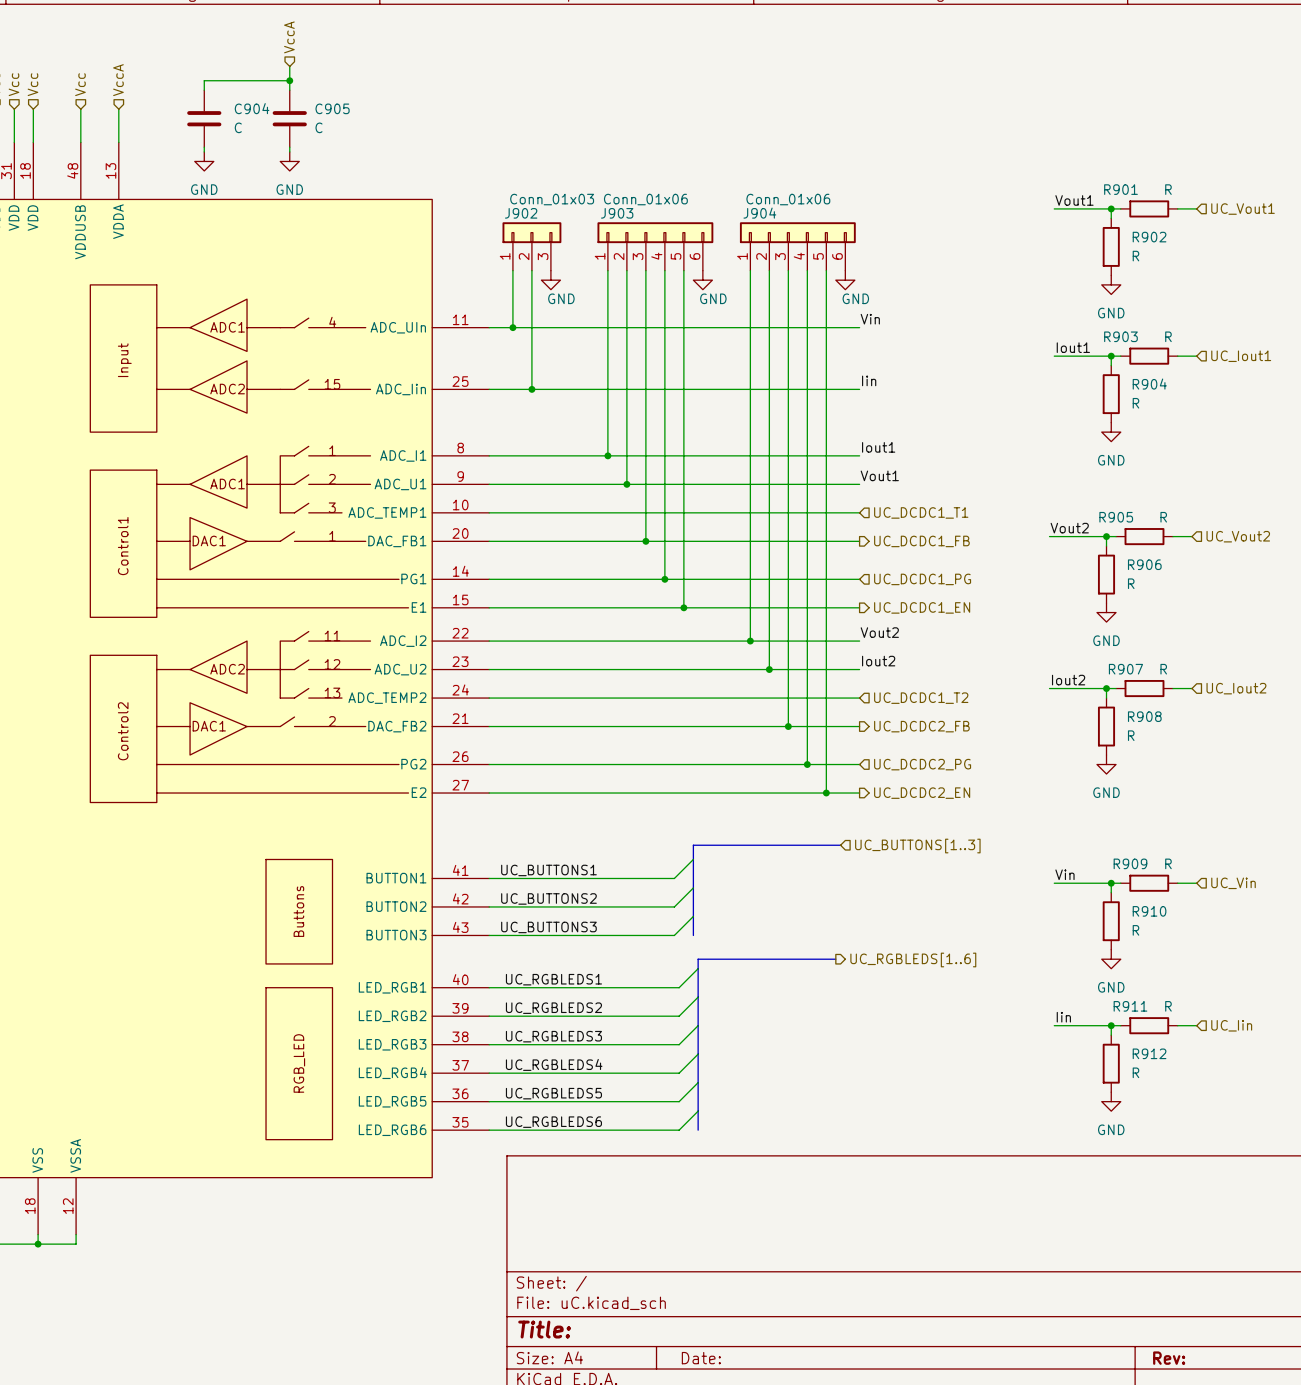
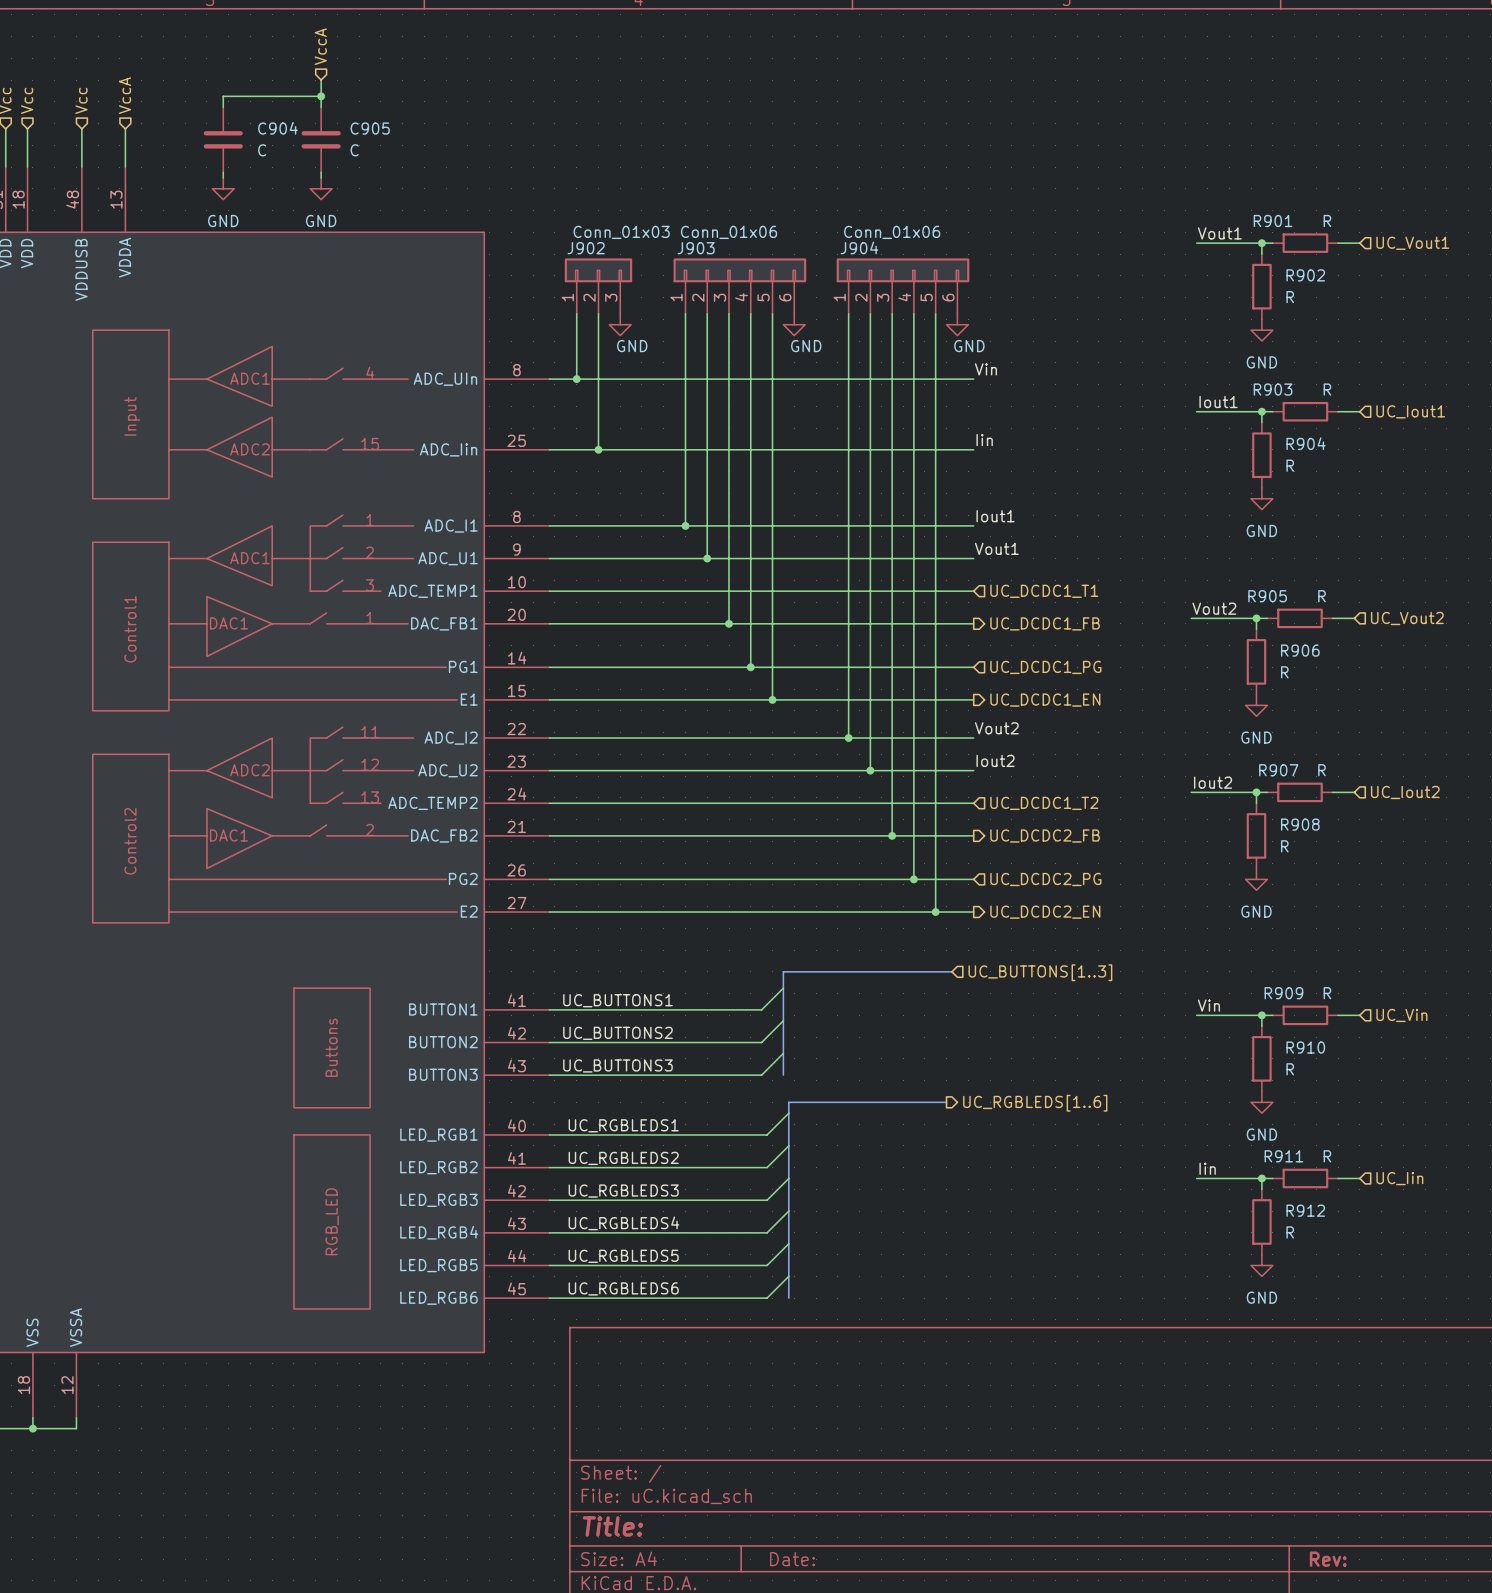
part pin number: 11 (460, 319) -> 8 (516, 370)
part pin number: 39 (460, 1008) -> 41 (516, 1158)
part pin number: 38 (460, 1036) -> 42 (516, 1191)
part pin number: 37 (460, 1065) -> 43 (516, 1223)
part pin number: 36 (460, 1093) -> 44 (517, 1256)
part pin number: 35 (460, 1122) -> 45 (516, 1288)

